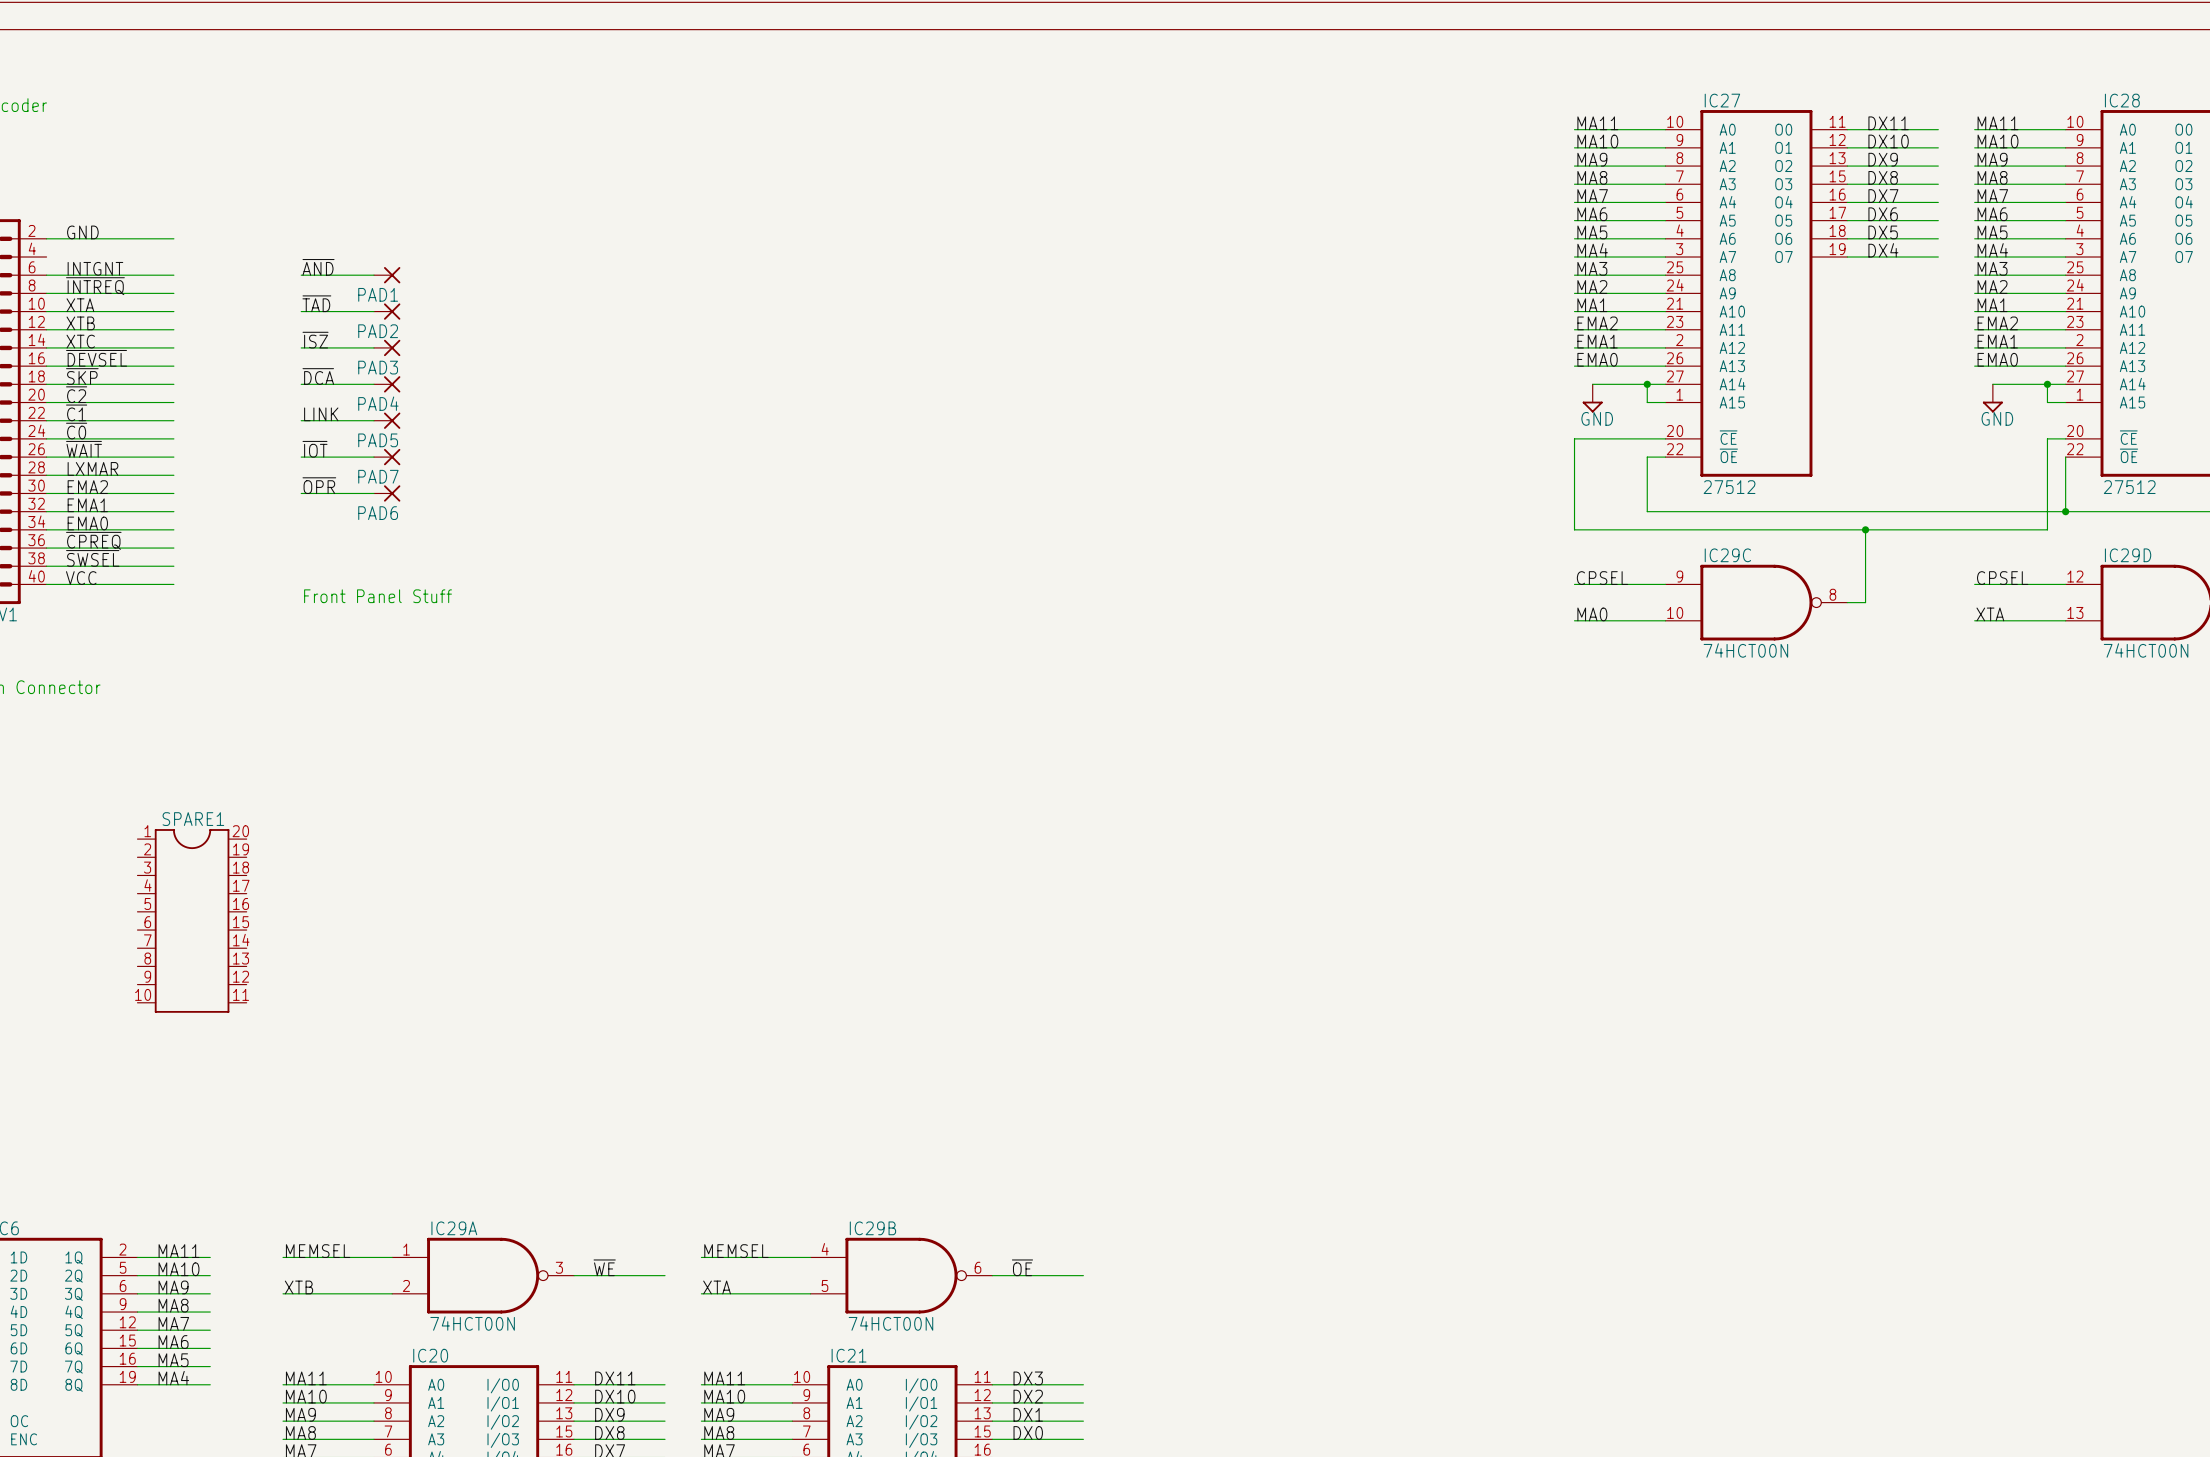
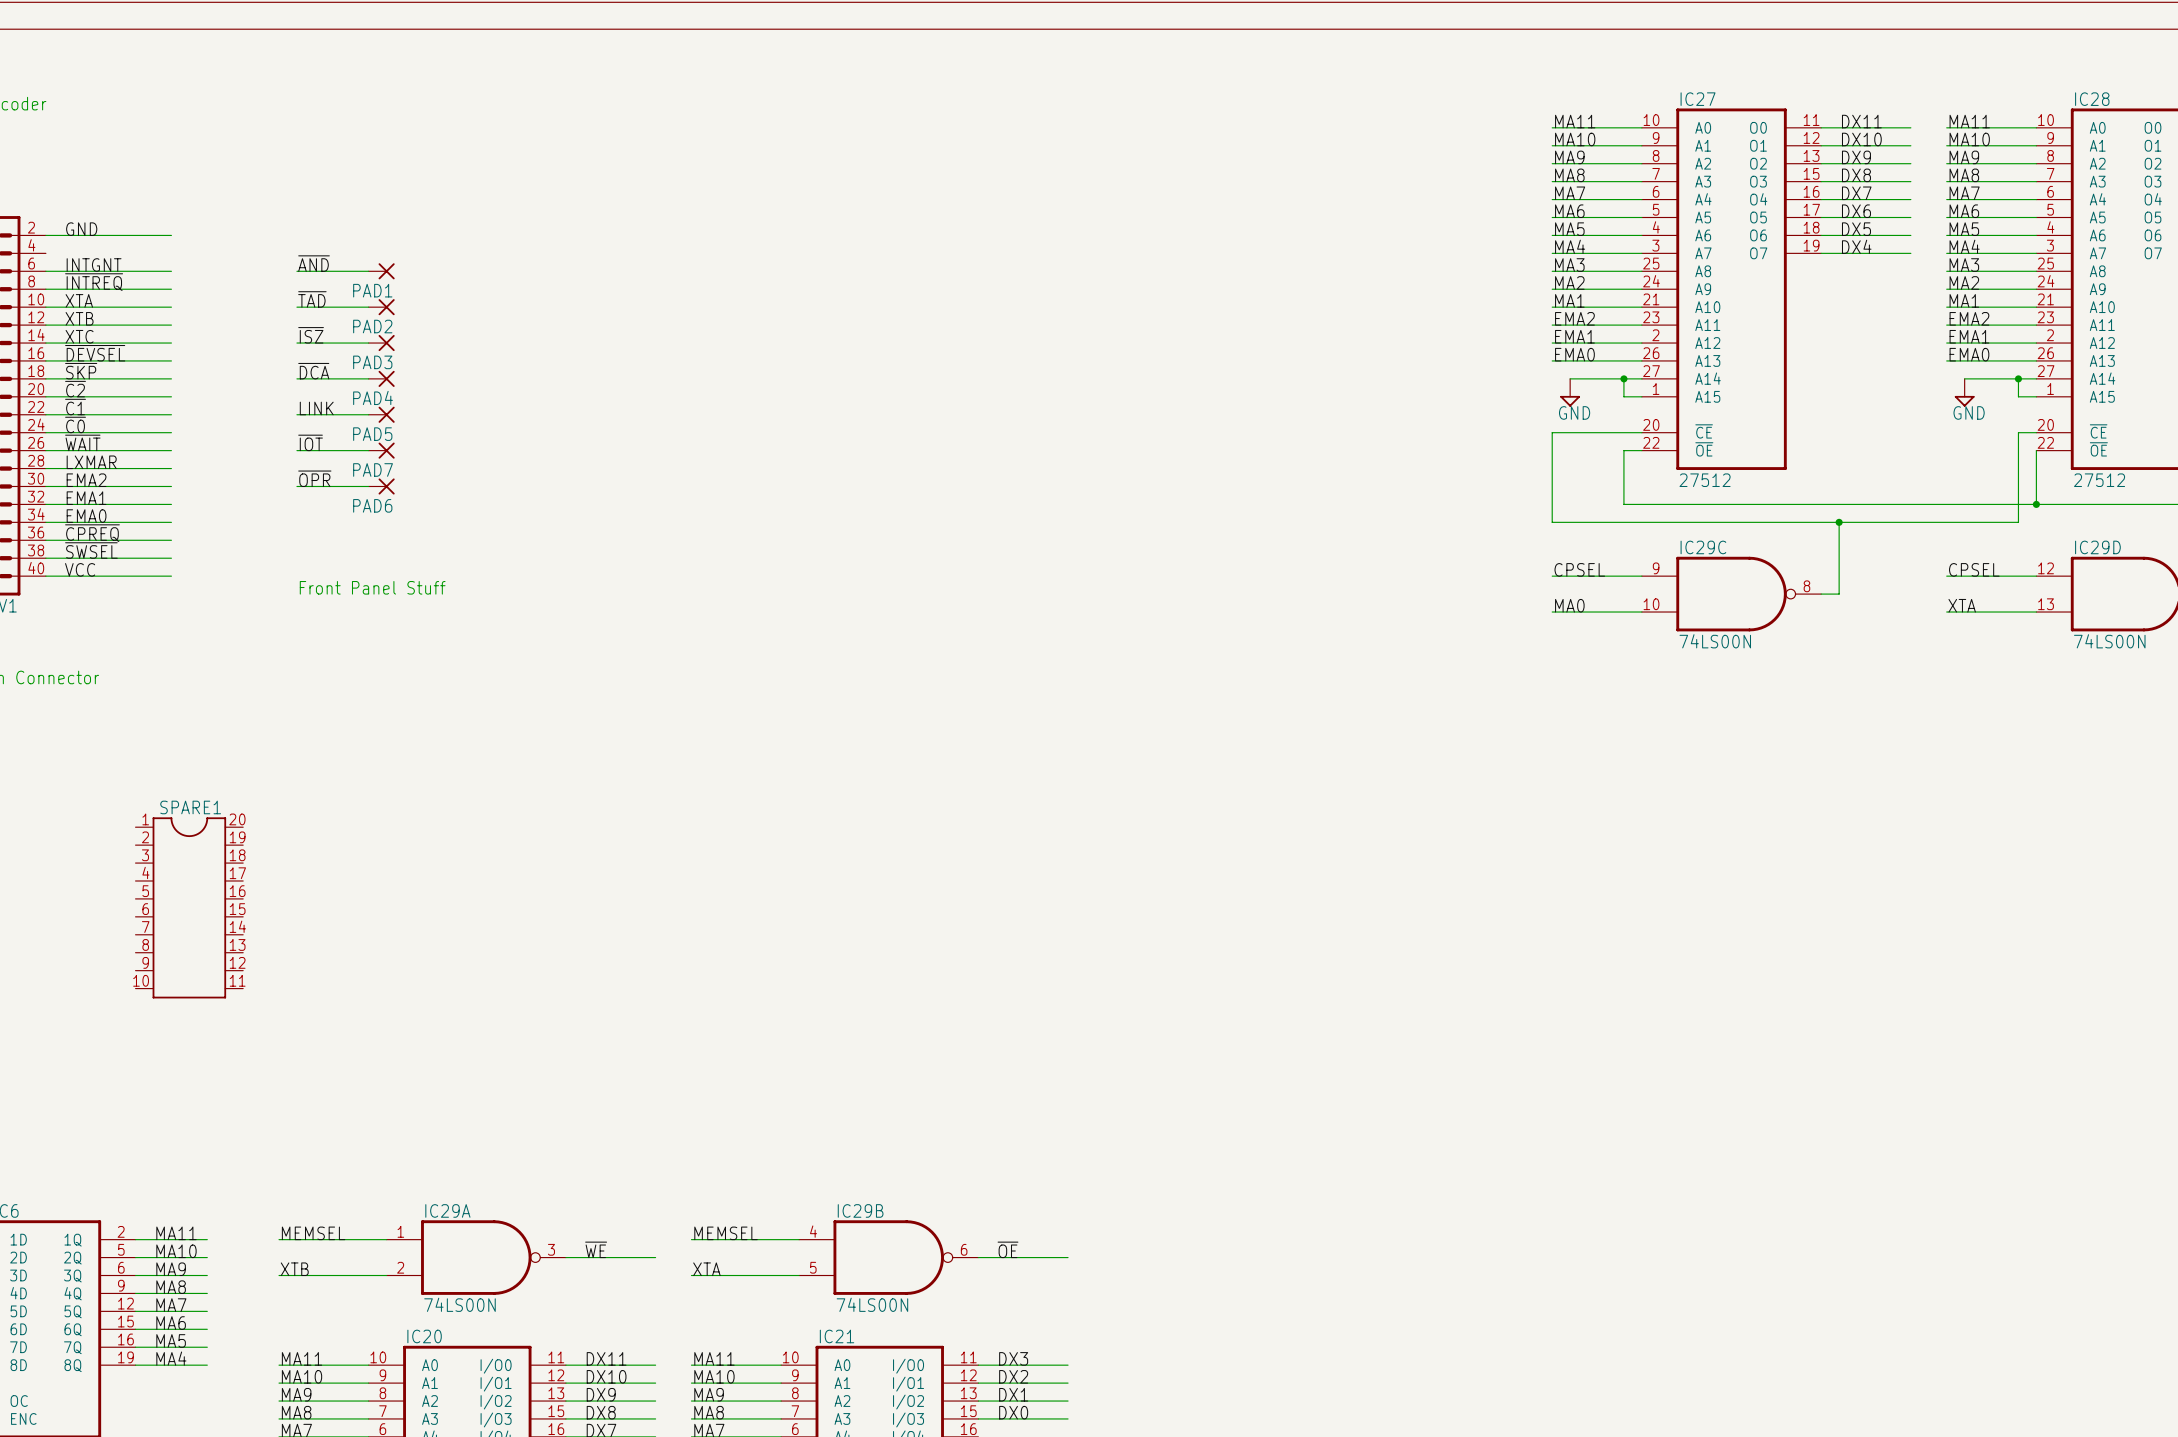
IC29C value: 74HCT00N (1745, 650) -> 74LS00N (1715, 641)
IC29D value: 74HCT00N (2146, 650) -> 74LS00N (2109, 641)
IC29A value: 74HCT00N (472, 1323) -> 74LS00N (459, 1304)
IC29B value: 74HCT00N (890, 1323) -> 74LS00N (872, 1304)

